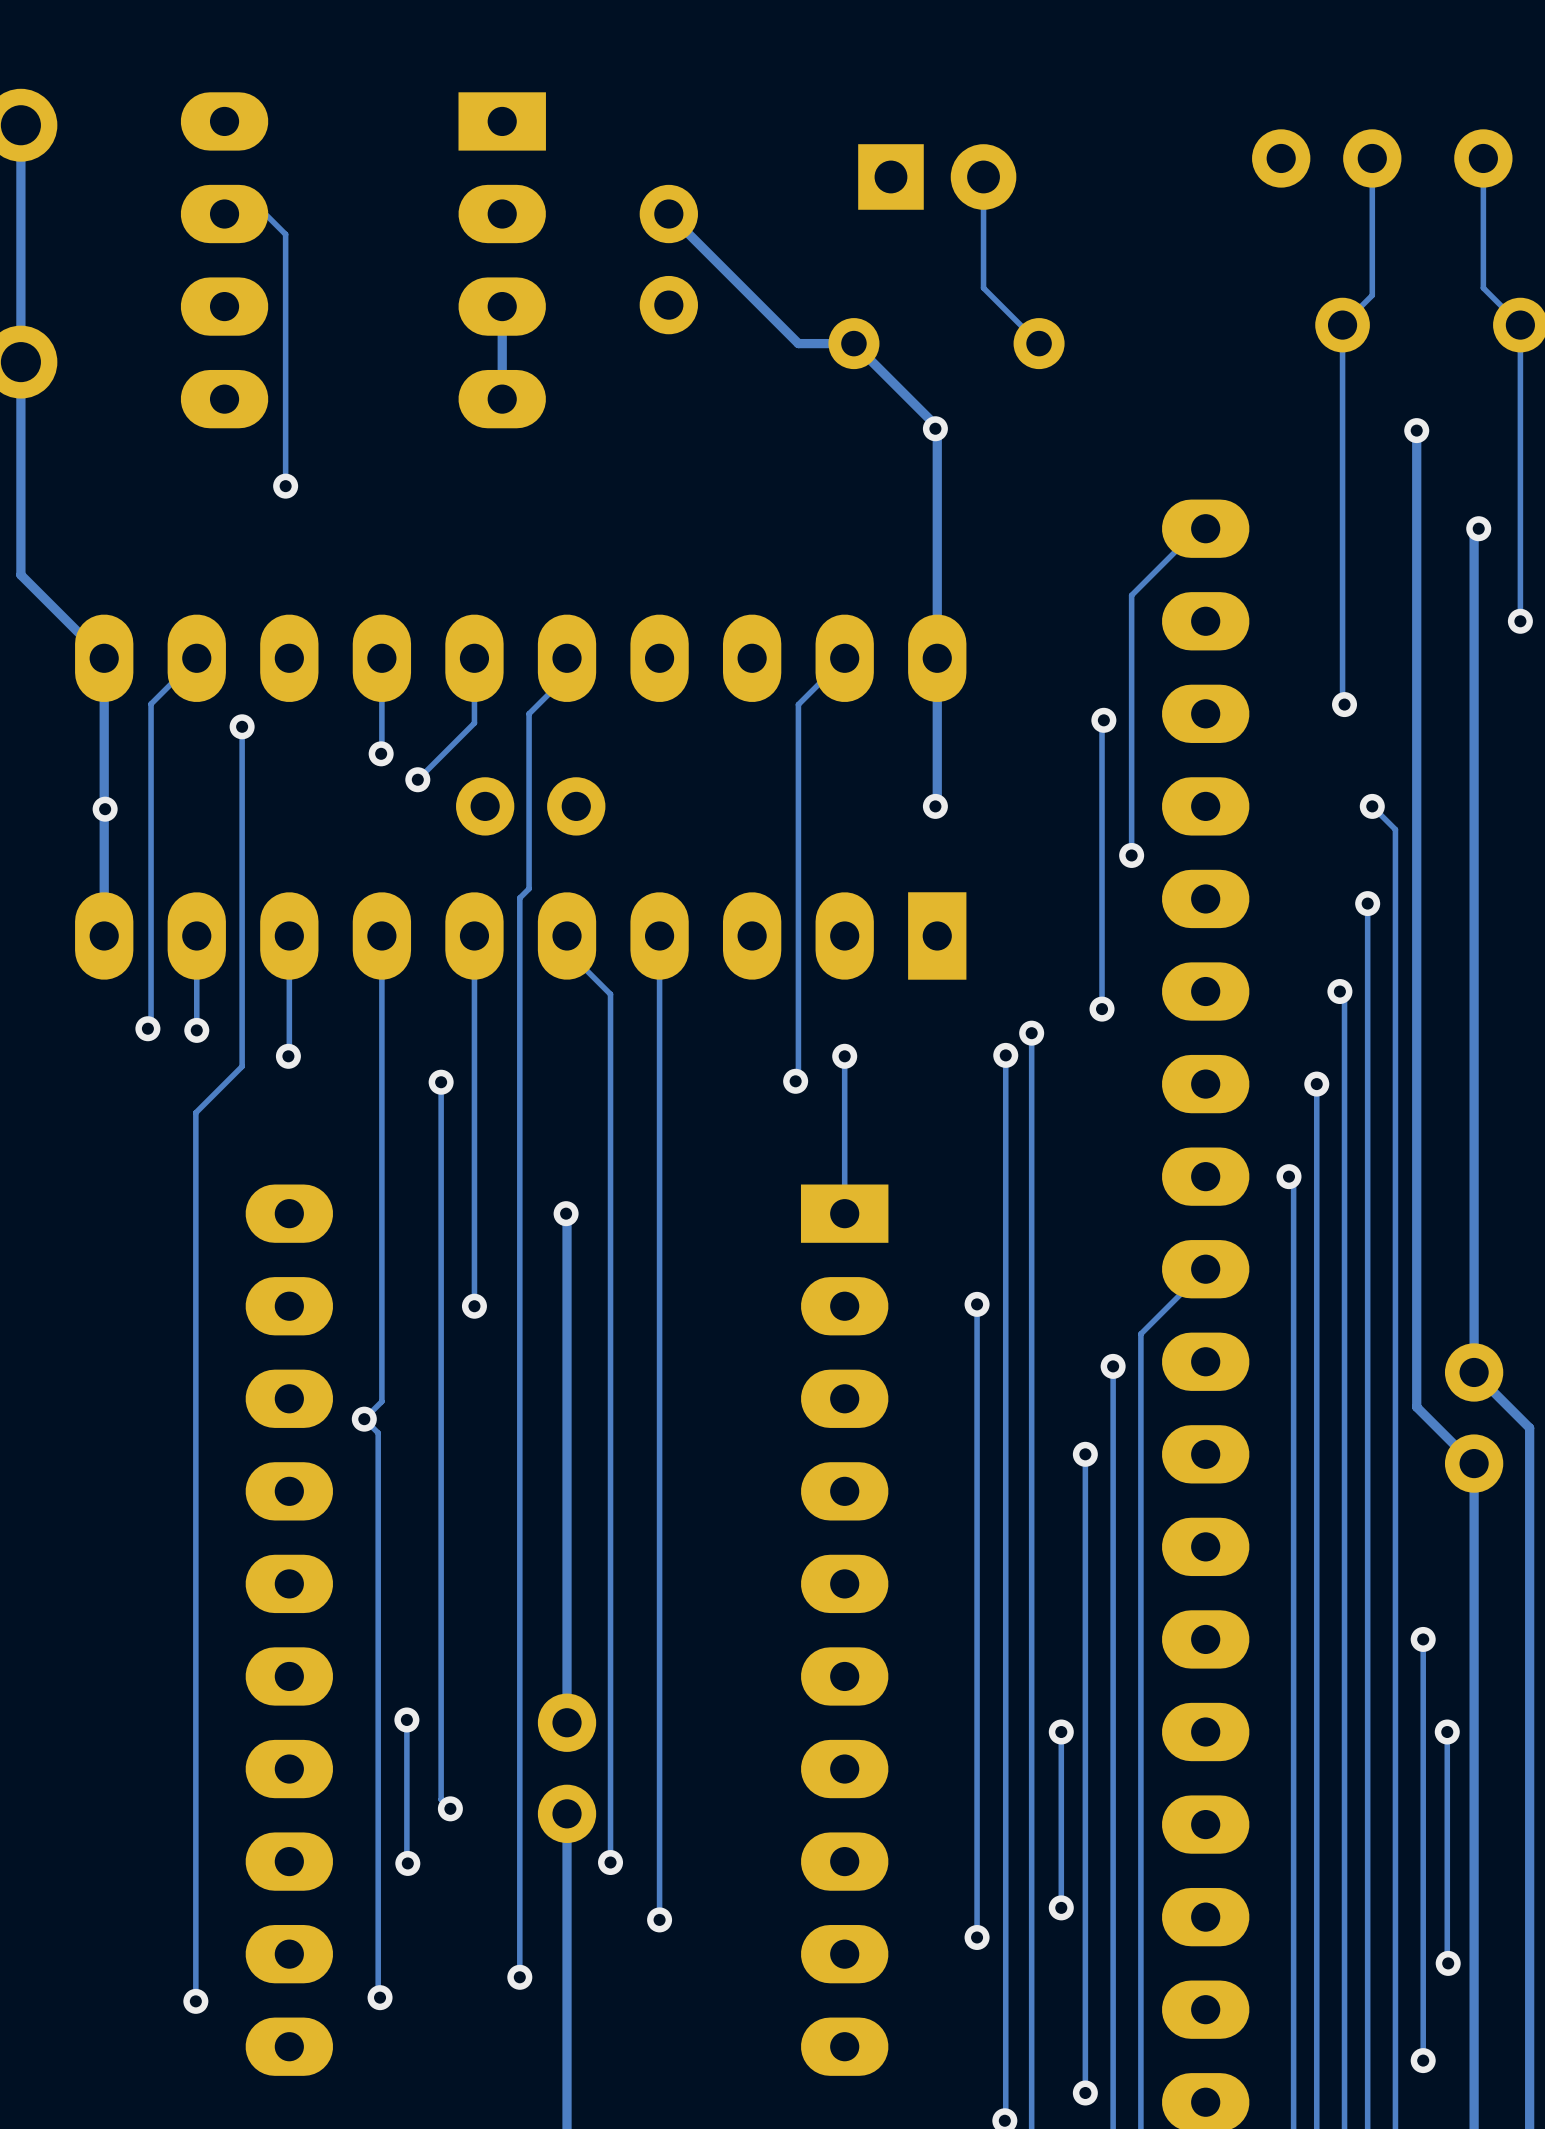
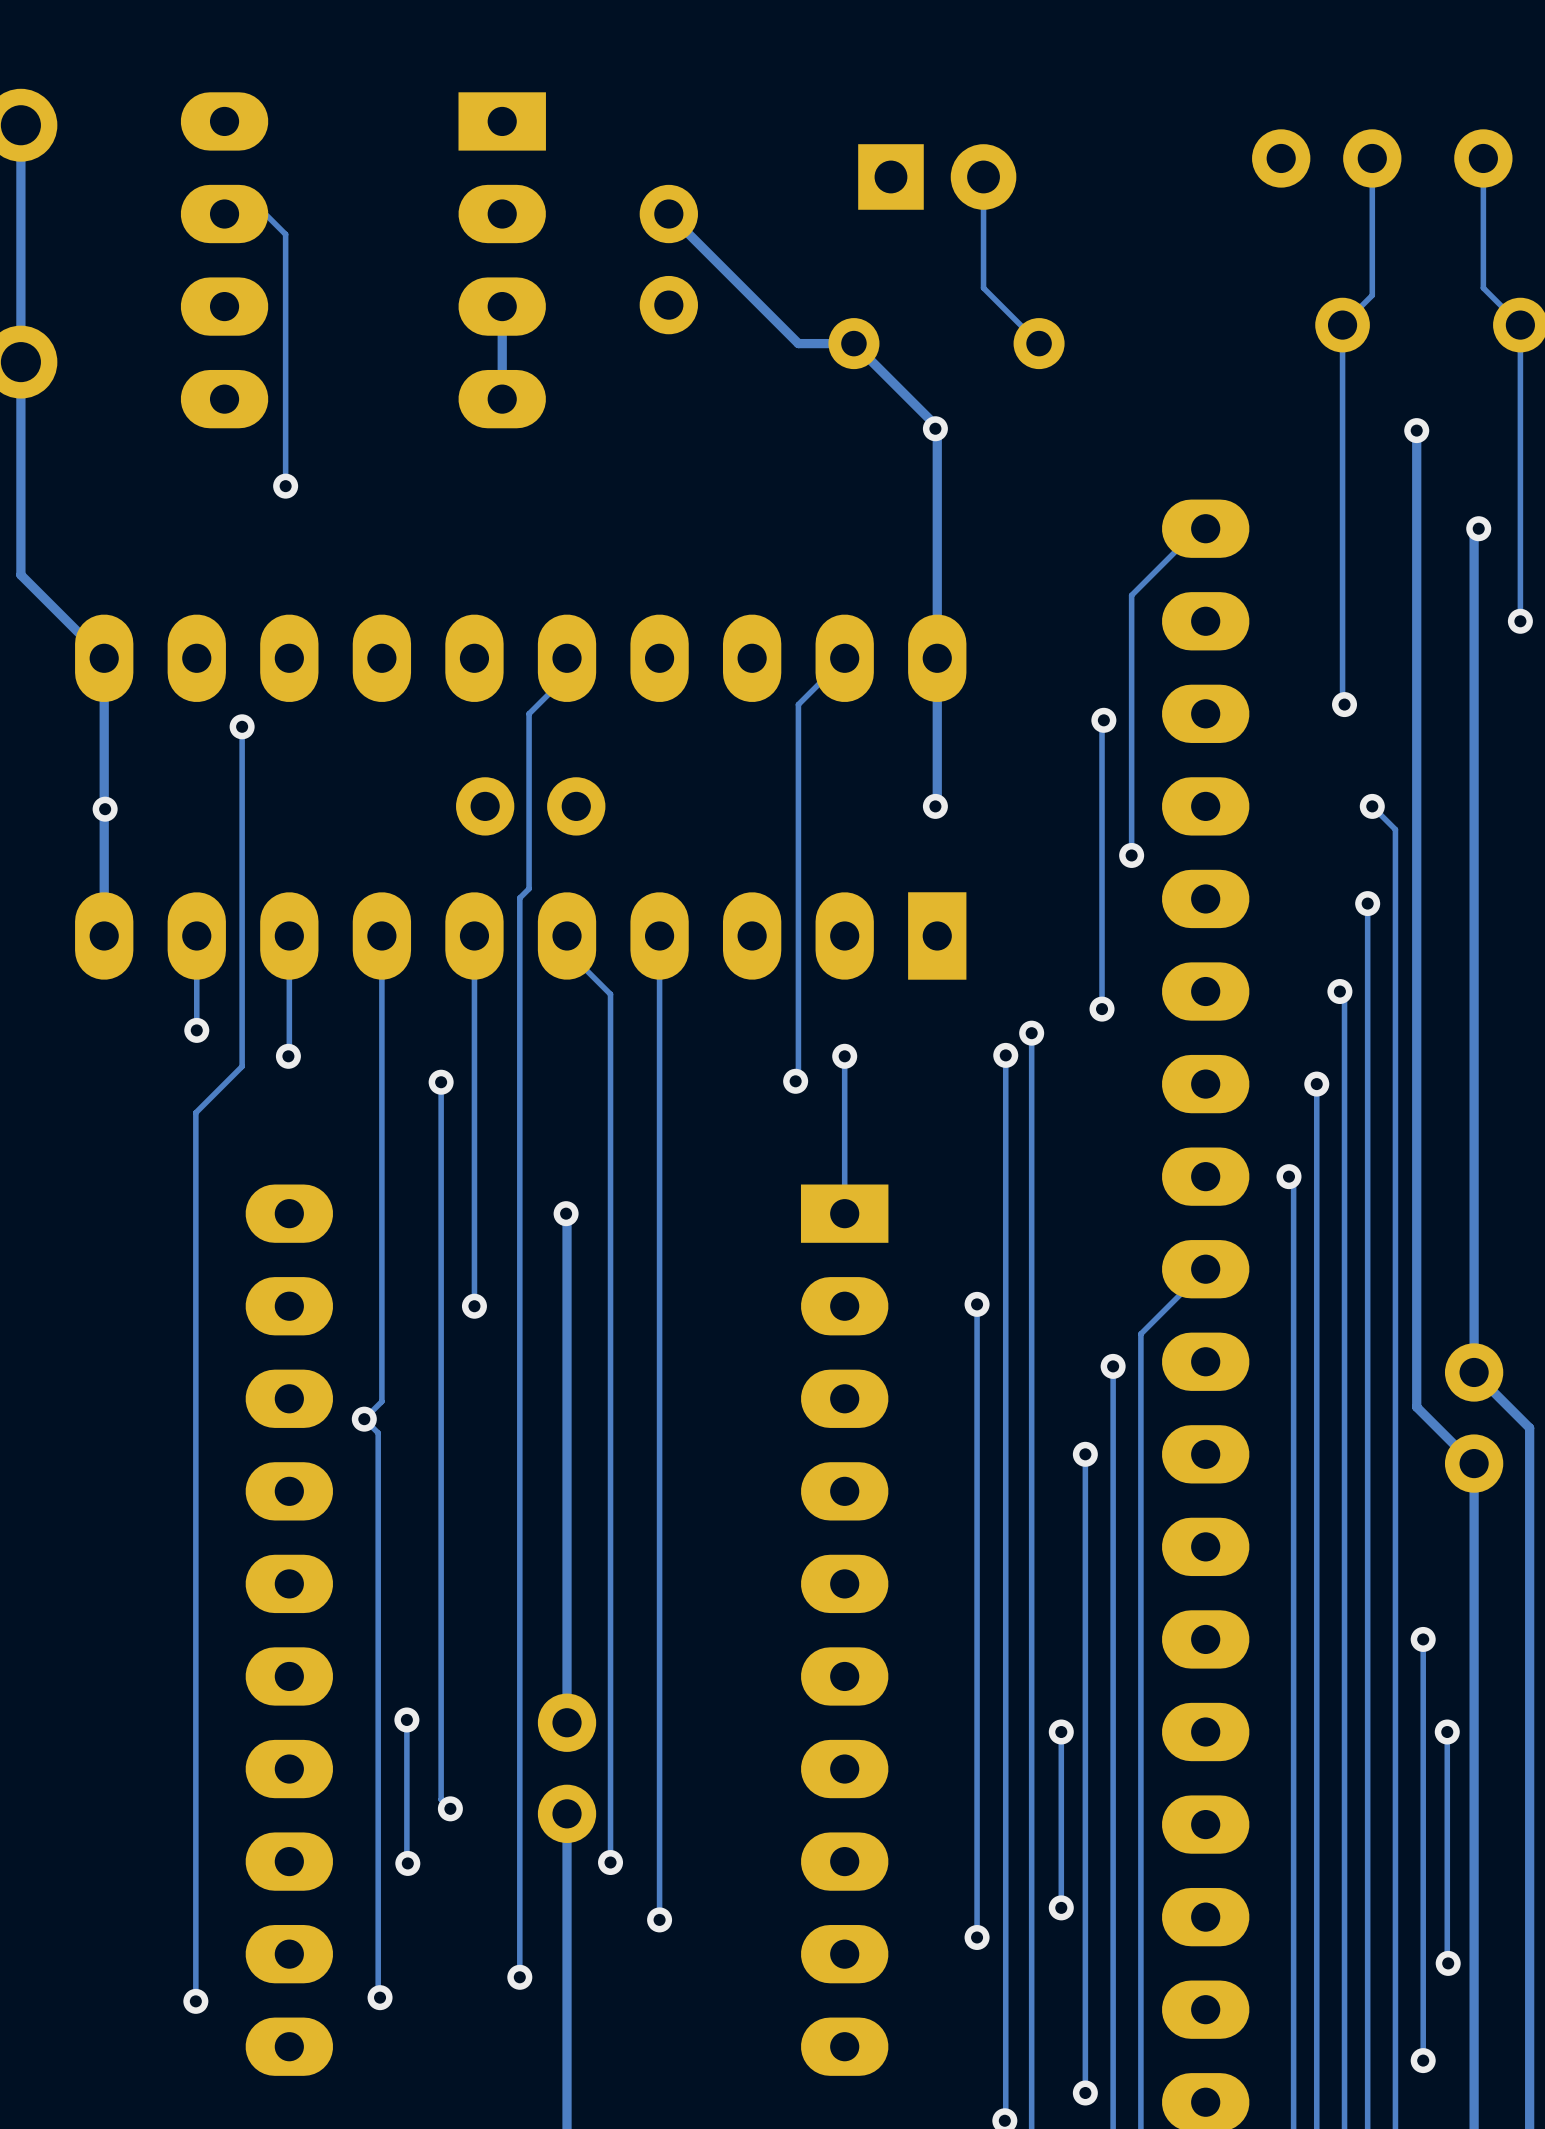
track: (196, 658) (151, 704) (151, 1025) (147, 1028) -> none
track: (381, 658) (381, 753) -> none
track: (474, 658) (474, 723) (417, 779) -> none
via: (381, 753) -> none
via: (417, 779) -> none
via: (147, 1028) -> none

